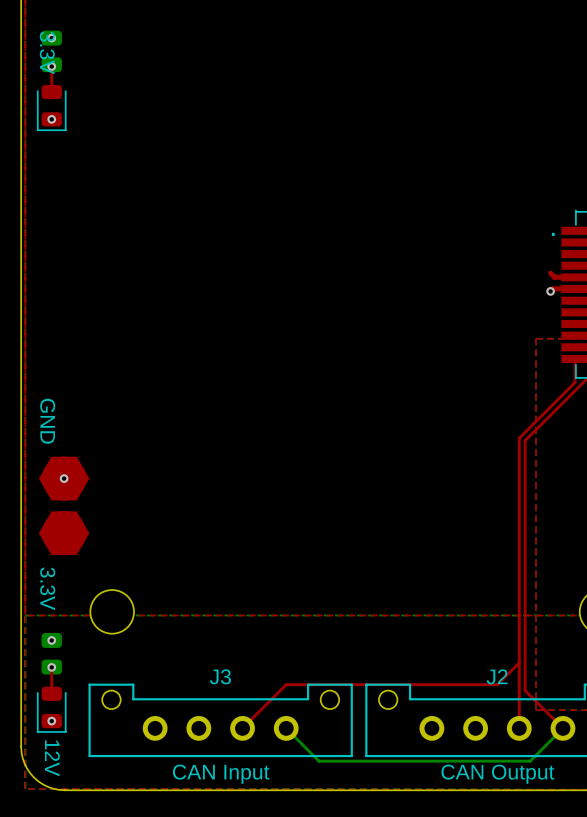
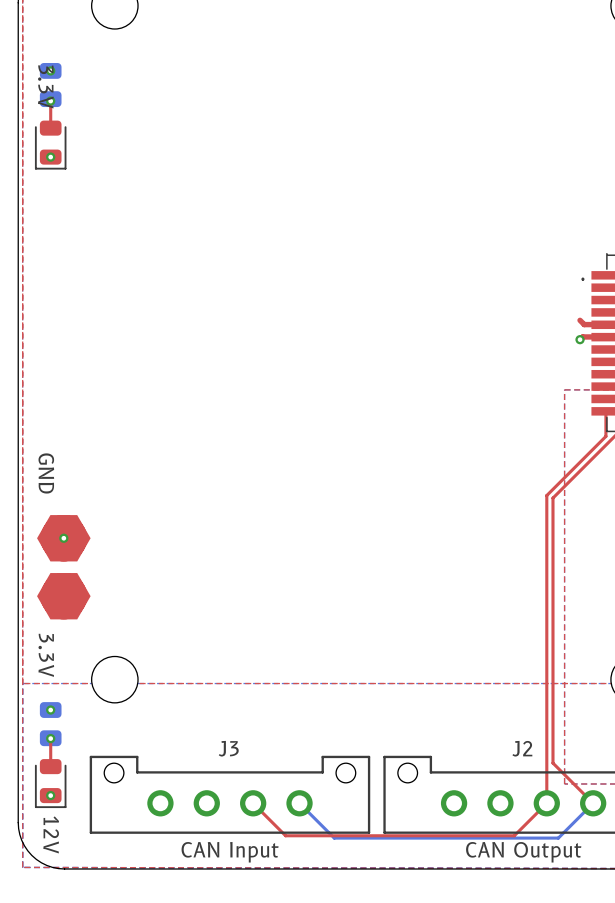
top track: (519, 662) (497, 684) (286, 684) (242, 728) -> (546, 803) (514, 835) (285, 835) (253, 803)

